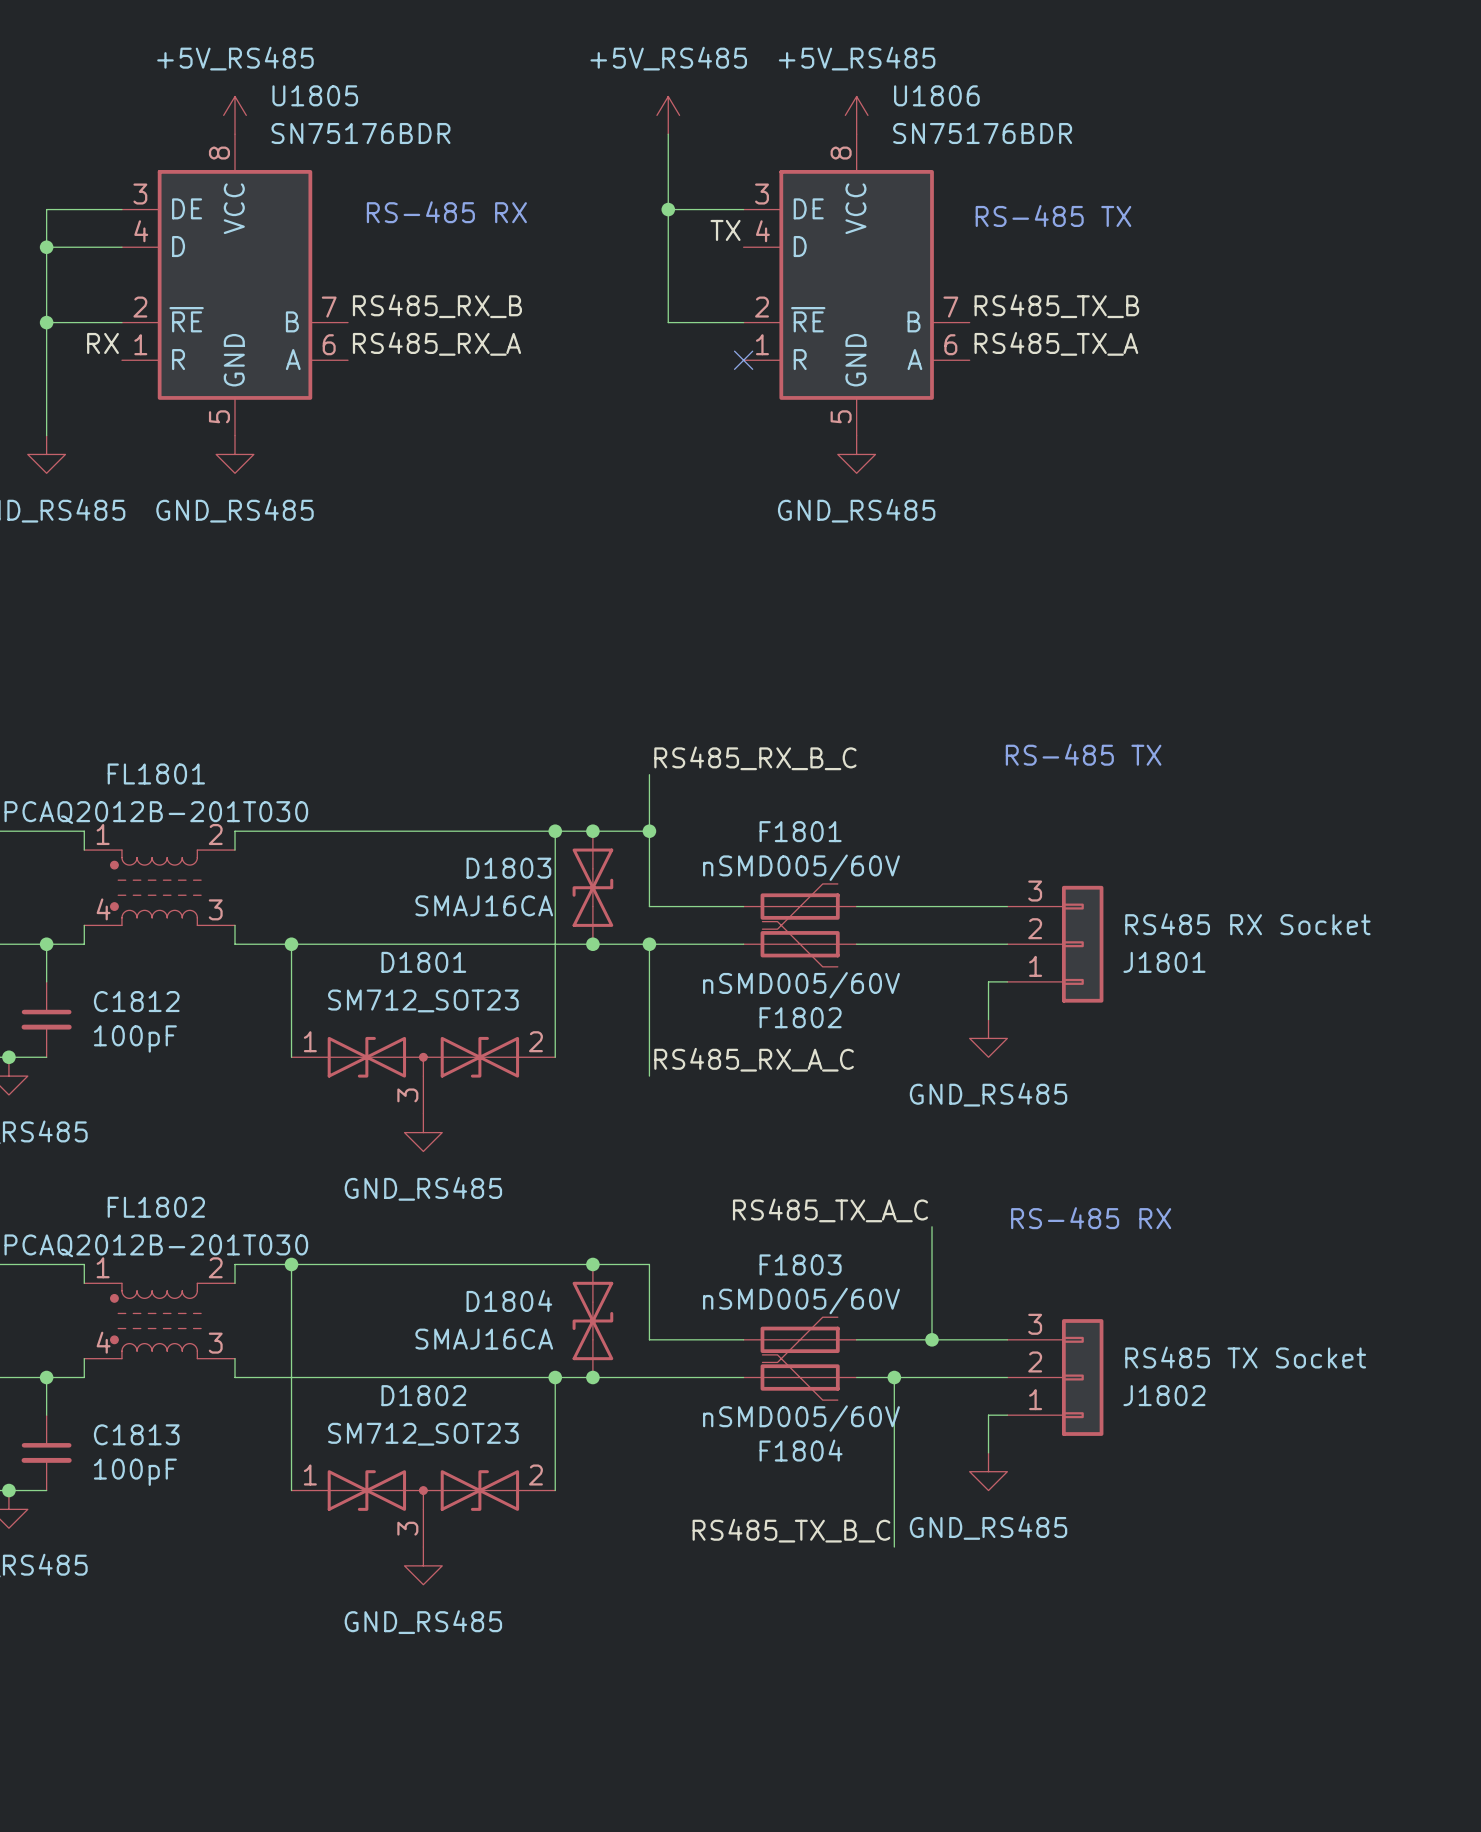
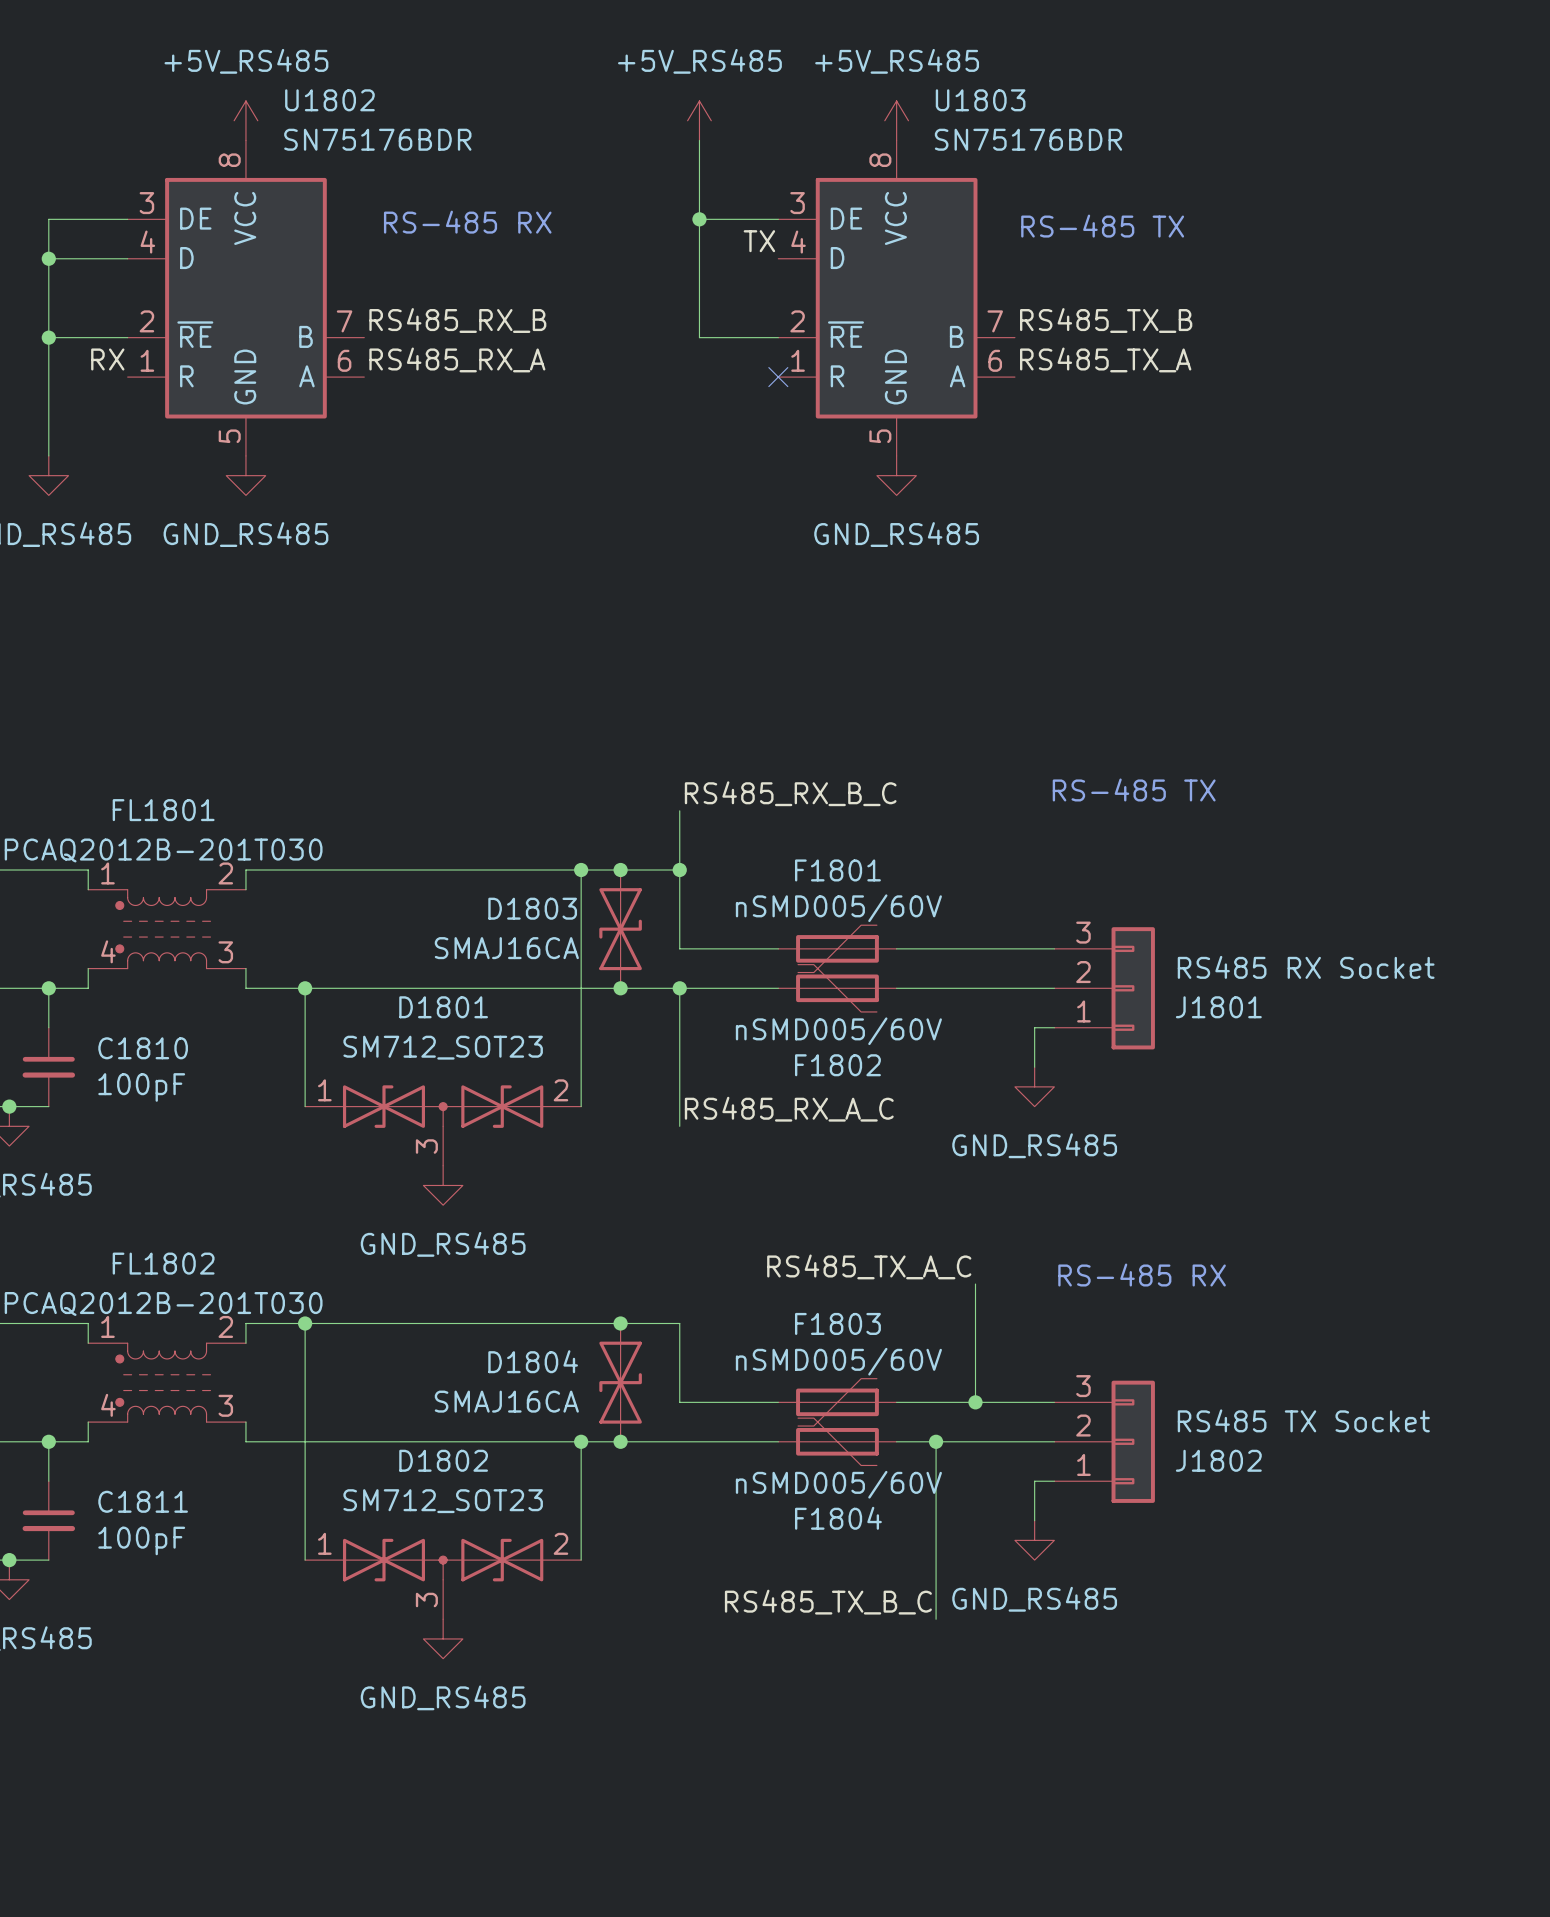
U1805 name: U1805 (315, 95) -> U1802 (329, 100)
U1806 name: U1806 (936, 95) -> U1803 (980, 100)
C1812 name: C1812 (136, 1001) -> C1810 (143, 1048)
C1813 name: C1813 (136, 1434) -> C1811 (143, 1501)

